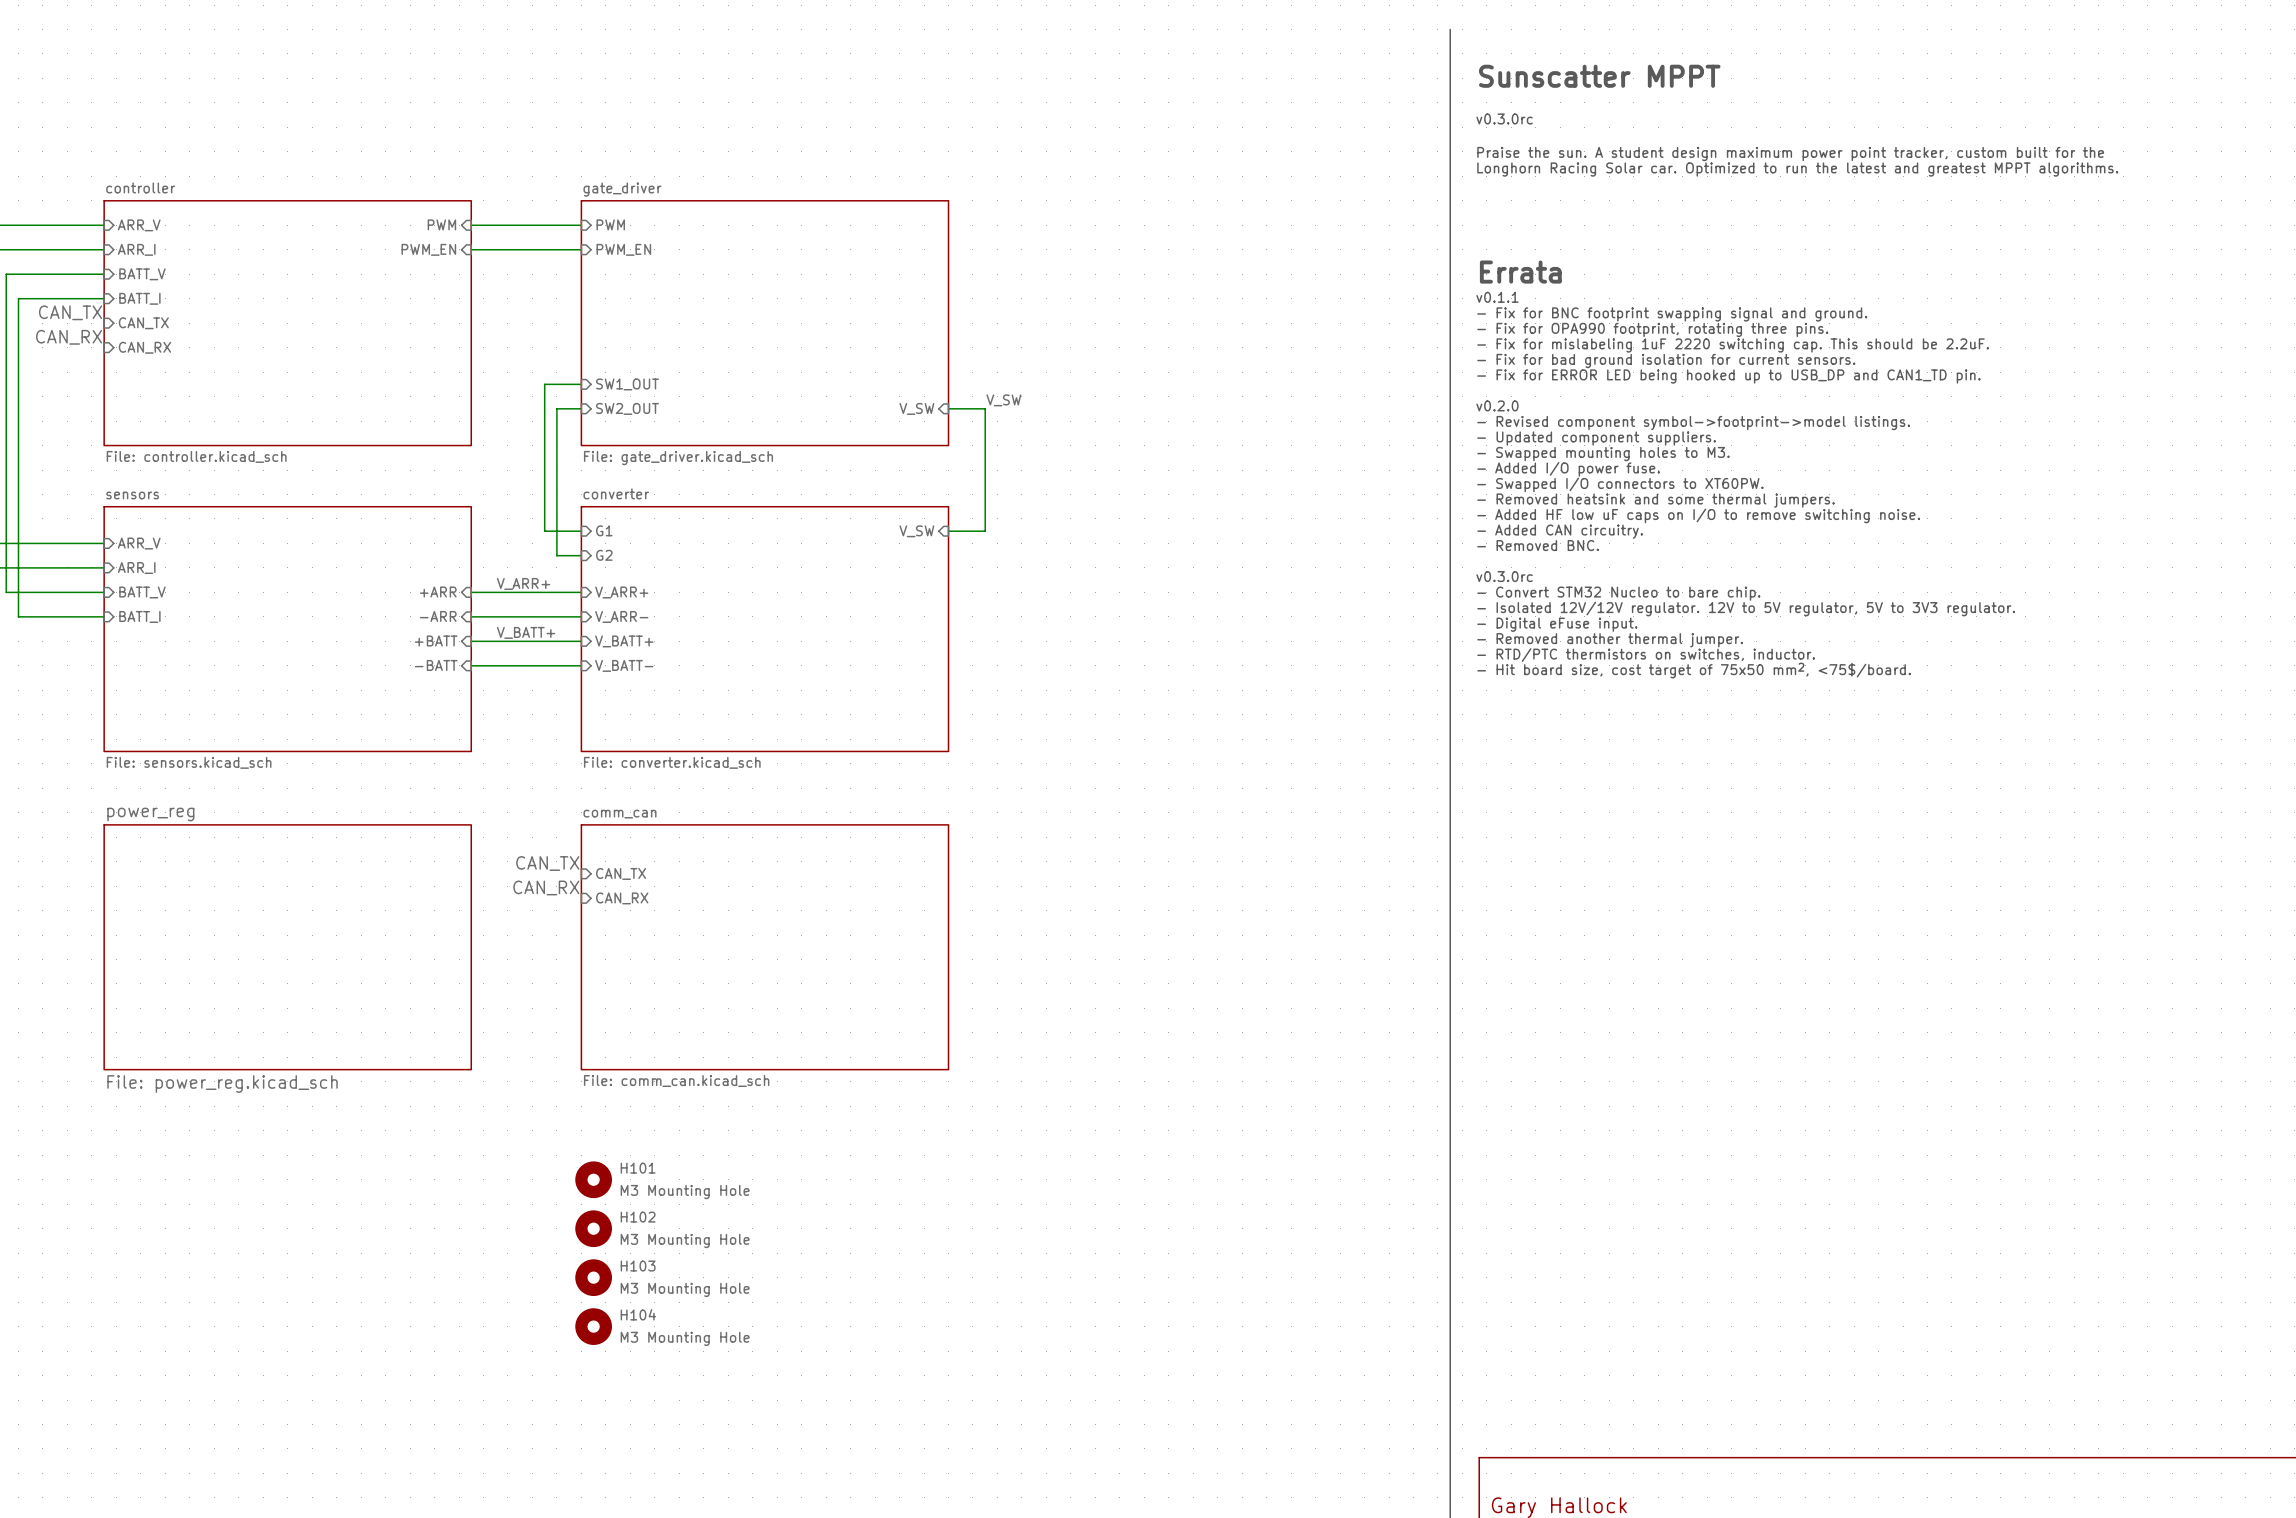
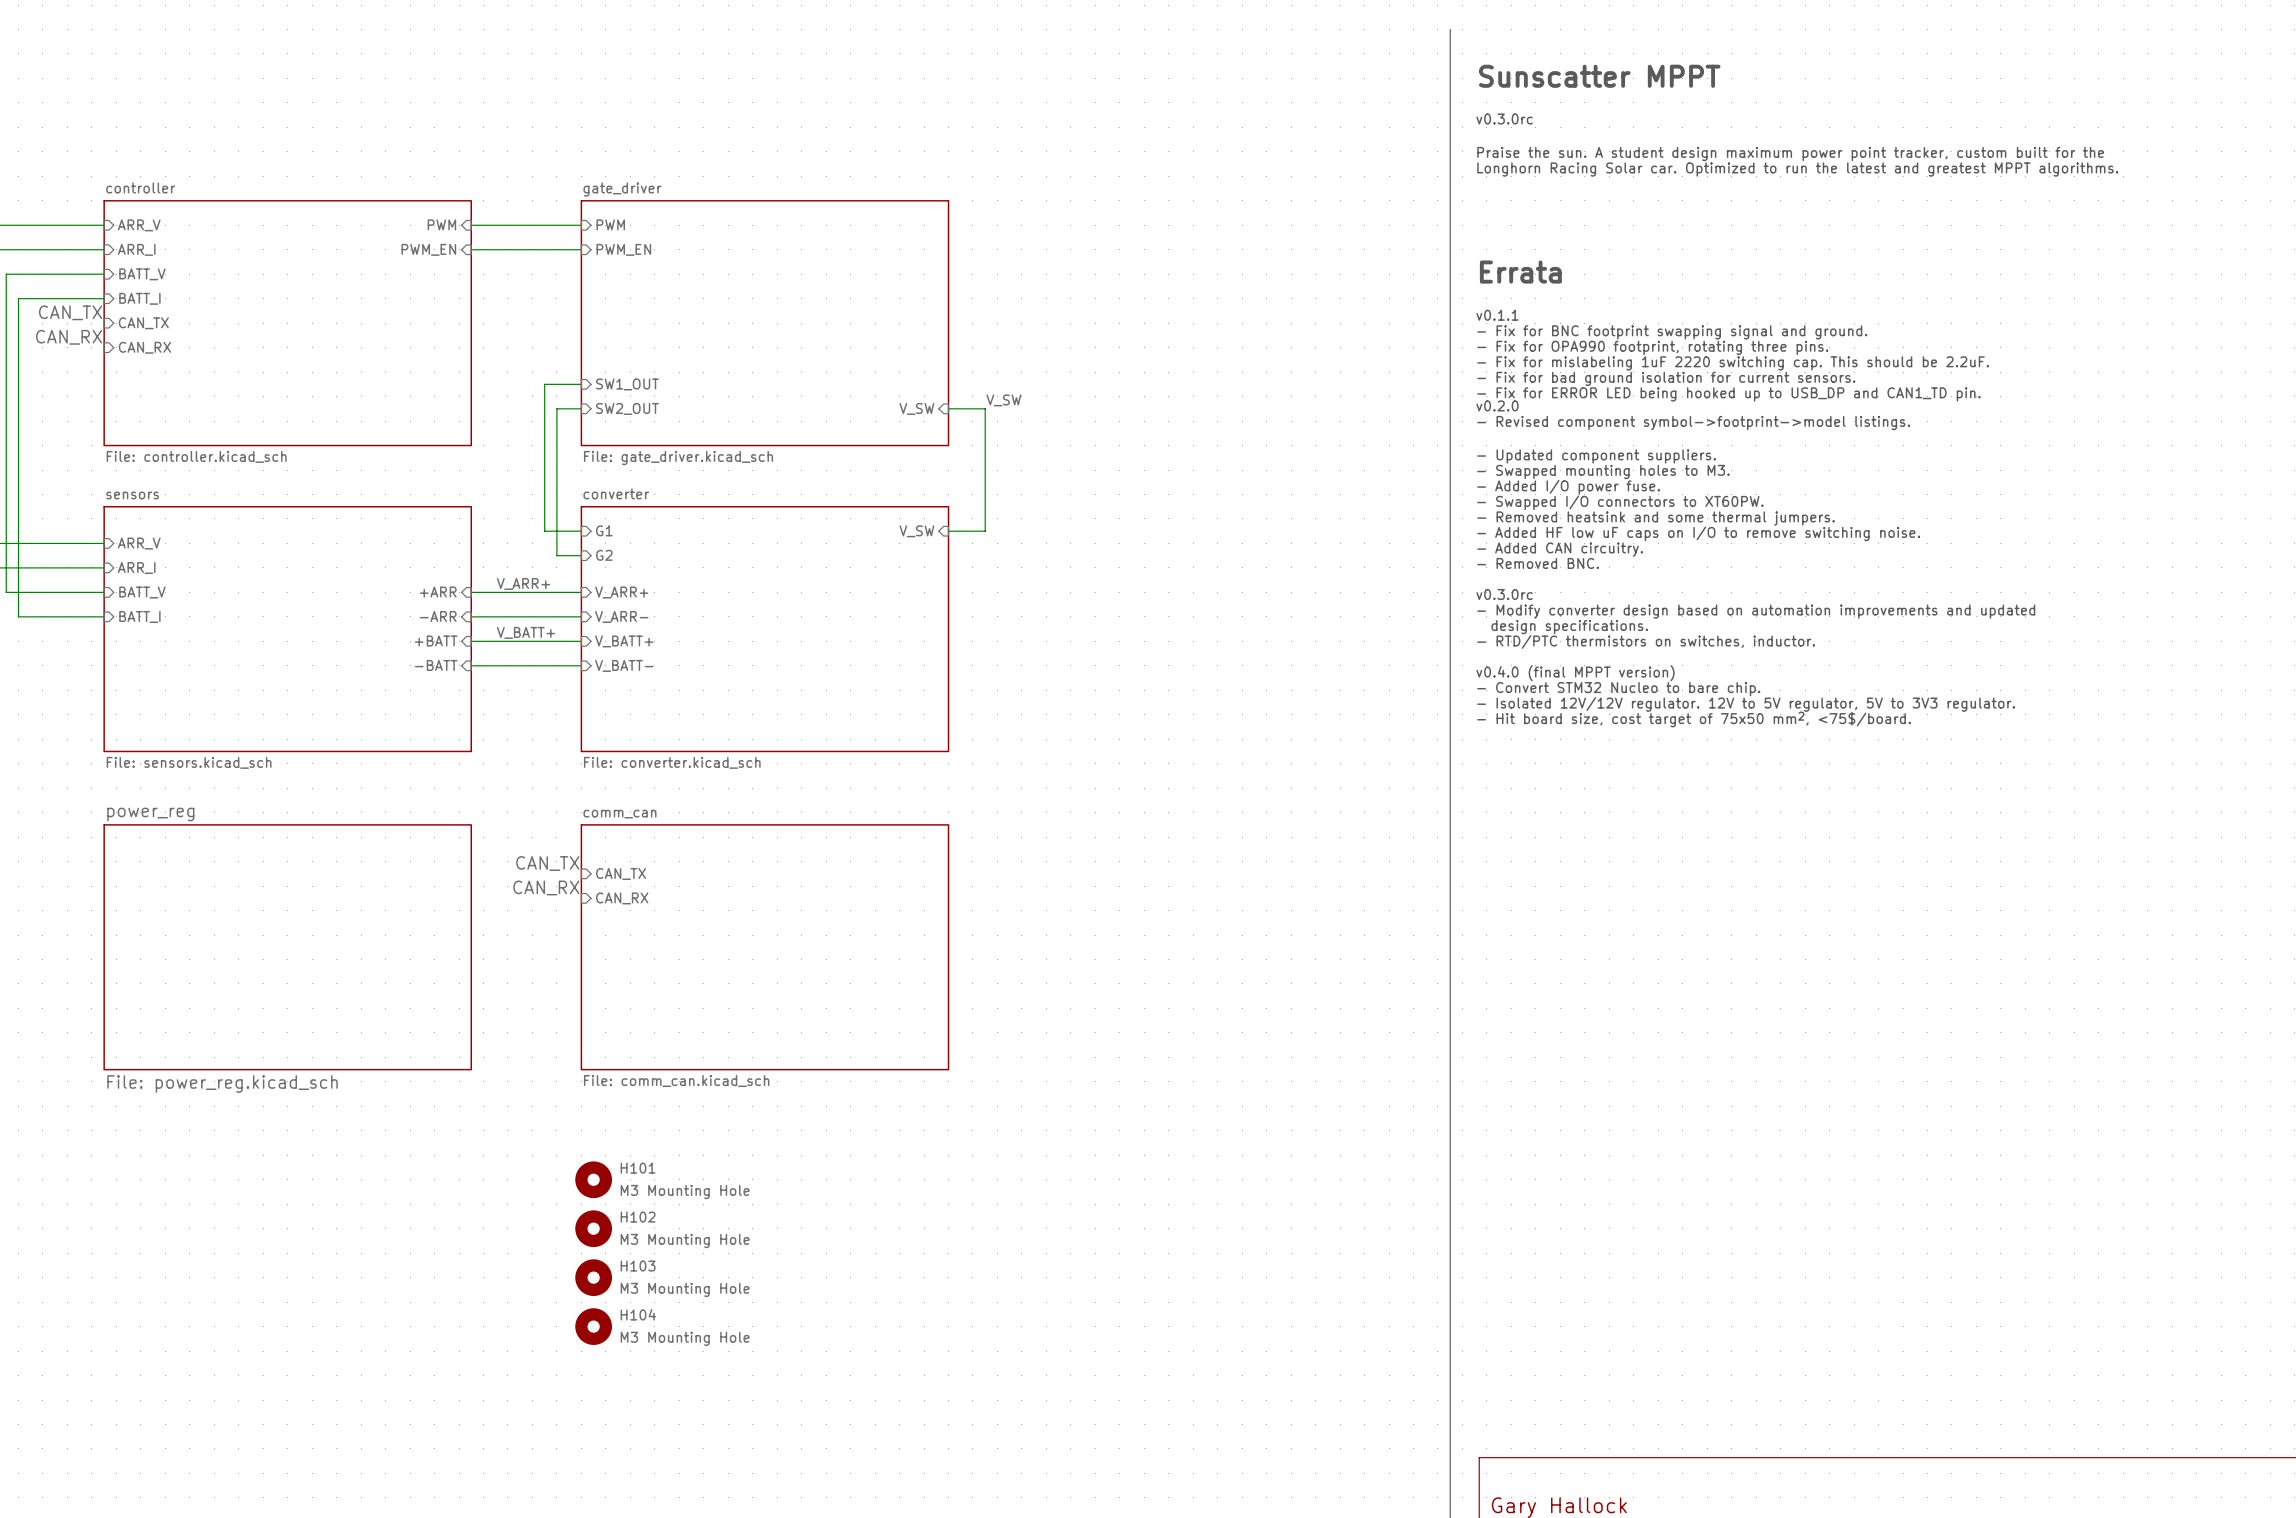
text position: v0.1.1 (1497, 297) -> v0.1.1 (1497, 315)
text position: - Fix for BNC footprint swapping signal and ground. (1672, 314) -> - Fix for BNC footprint swapping signal and ground. (1672, 332)
text position: - Fix for OPA990 footprint, rotating three pins. (1652, 329) -> - Fix for OPA990 footprint, rotating three pins. (1652, 347)
text position: - Fix for mislabeling 1uF 2220 switching cap. This should be 2.2uF. (1733, 345) -> - Fix for mislabeling 1uF 2220 switching cap. This should be 2.2uF. (1733, 363)
text position: - Fix for bad ground isolation for current sensors. (1666, 360) -> - Fix for bad ground isolation for current sensors. (1666, 378)
text position: - Fix for ERROR LED being hooked up to USB_DP and CAN1_TD pin. (1728, 376) -> - Fix for ERROR LED being hooked up to USB_DP and CAN1_TD pin. (1728, 394)
text position: - Updated component suppliers. (1596, 438) -> - Updated component suppliers. (1596, 456)
text position: - Swapped mounting holes to M3. (1603, 454) -> - Swapped mounting holes to M3. (1603, 471)
text position: - Added I/O power fuse. (1568, 469) -> - Added I/O power fuse. (1568, 487)
text position: - Swapped I/O connectors to XT60PW. (1620, 484) -> - Swapped I/O connectors to XT60PW. (1620, 502)
text position: - Removed heatsink and some thermal jumpers. (1655, 500) -> - Removed heatsink and some thermal jumpers. (1655, 518)
text position: - Added HF low uF caps on I/O to remove switching noise. (1698, 515) -> - Added HF low uF caps on I/O to remove switching noise. (1698, 533)
text position: - Added CAN circuitry. (1560, 531) -> - Added CAN circuitry. (1560, 549)
text position: - Removed BNC. (1538, 545) -> - Removed BNC. (1538, 563)
text position: v0.3.0rc (1504, 576) -> v0.3.0rc (1504, 594)
text position: - Convert STM32 Nucleo to bare chip. (1618, 593) -> - Convert STM32 Nucleo to bare chip. (1618, 689)
text position: - Isolated 12V/12V regulator. 12V to 5V regulator, 5V to 3V3 regulator. (1746, 608) -> - Isolated 12V/12V regulator. 12V to 5V regulator, 5V to 3V3 regulator. (1746, 704)
text: none -> - Modify converter design based on automation improvements and updated (1756, 611)
text: - Digital eFuse input. (1557, 624) -> design specifications. (1569, 627)
text: - Removed another thermal jumper. (1610, 640) -> none
text position: - RTD/PTC thermistors on switches, inductor. (1646, 655) -> - RTD/PTC thermistors on switches, inductor. (1646, 641)
text position: - Hit board size, cost target of 75x50 mm2, <75$/board. (1694, 670) -> - Hit board size, cost target of 75x50 mm2, <75$/board. (1694, 719)
text: none -> v0.4.0 (final MPPT version) (1575, 673)

